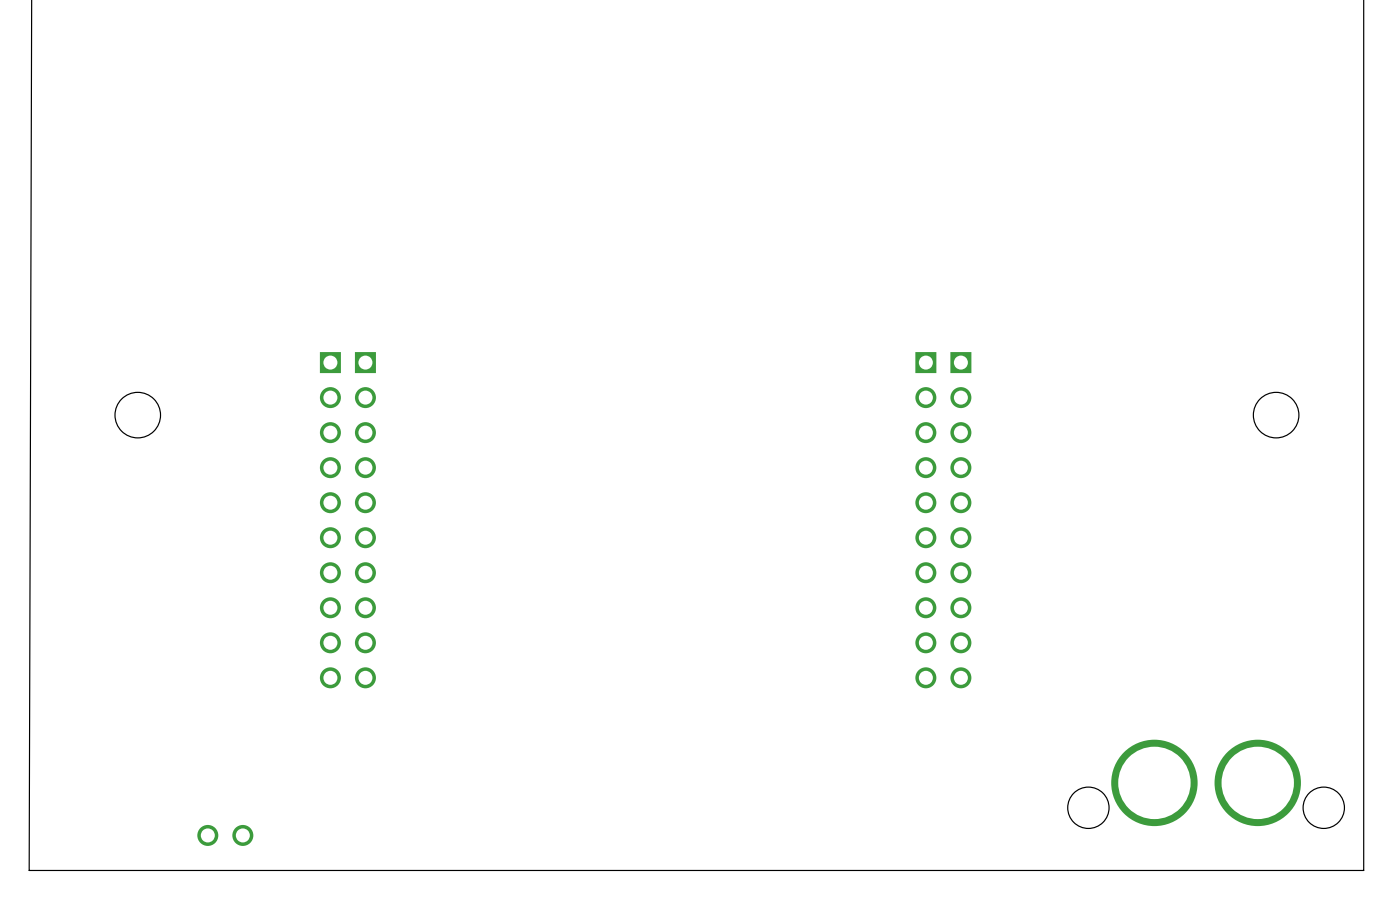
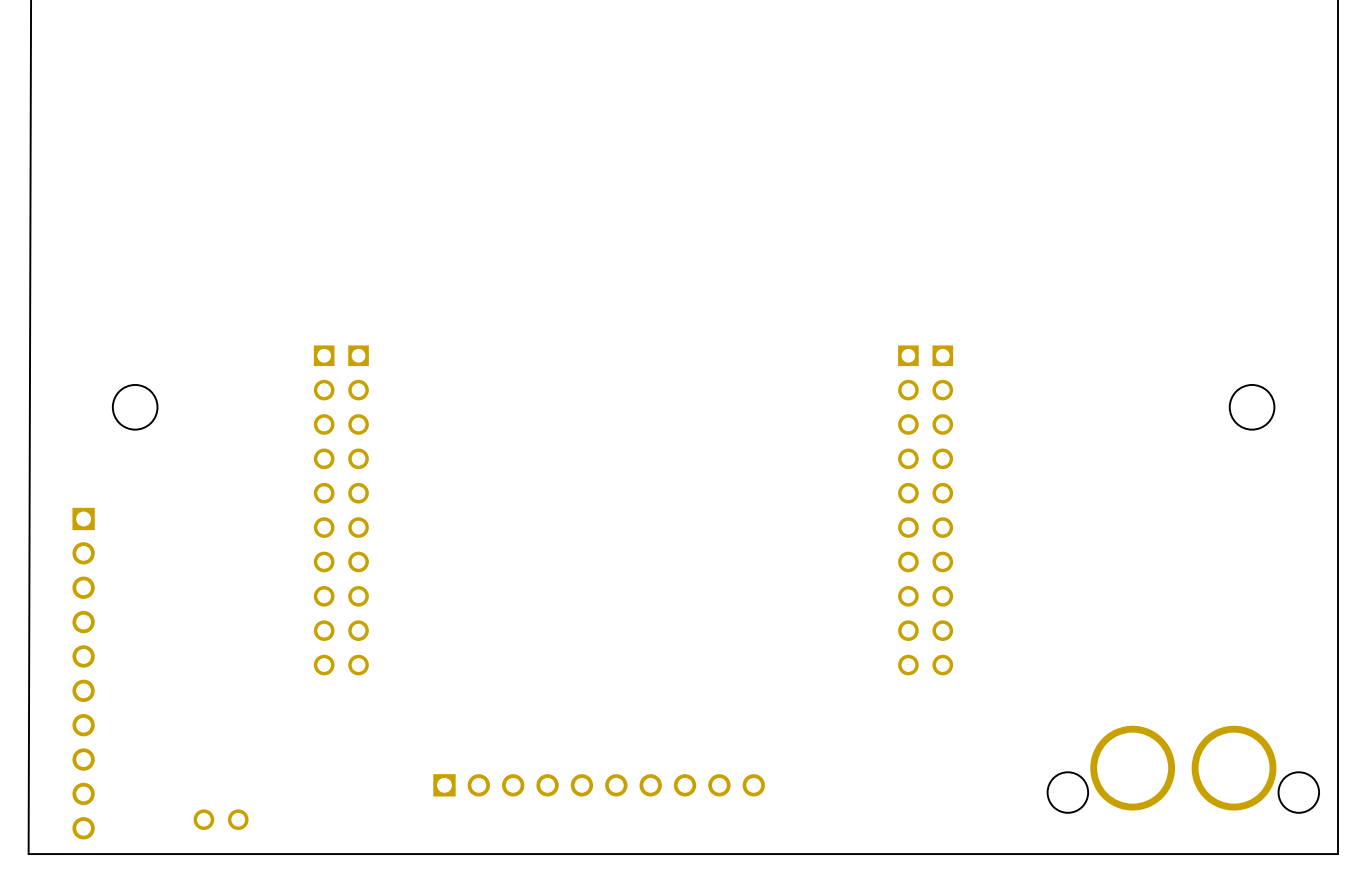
part: none -> (83, 673)
part: none -> (599, 785)

